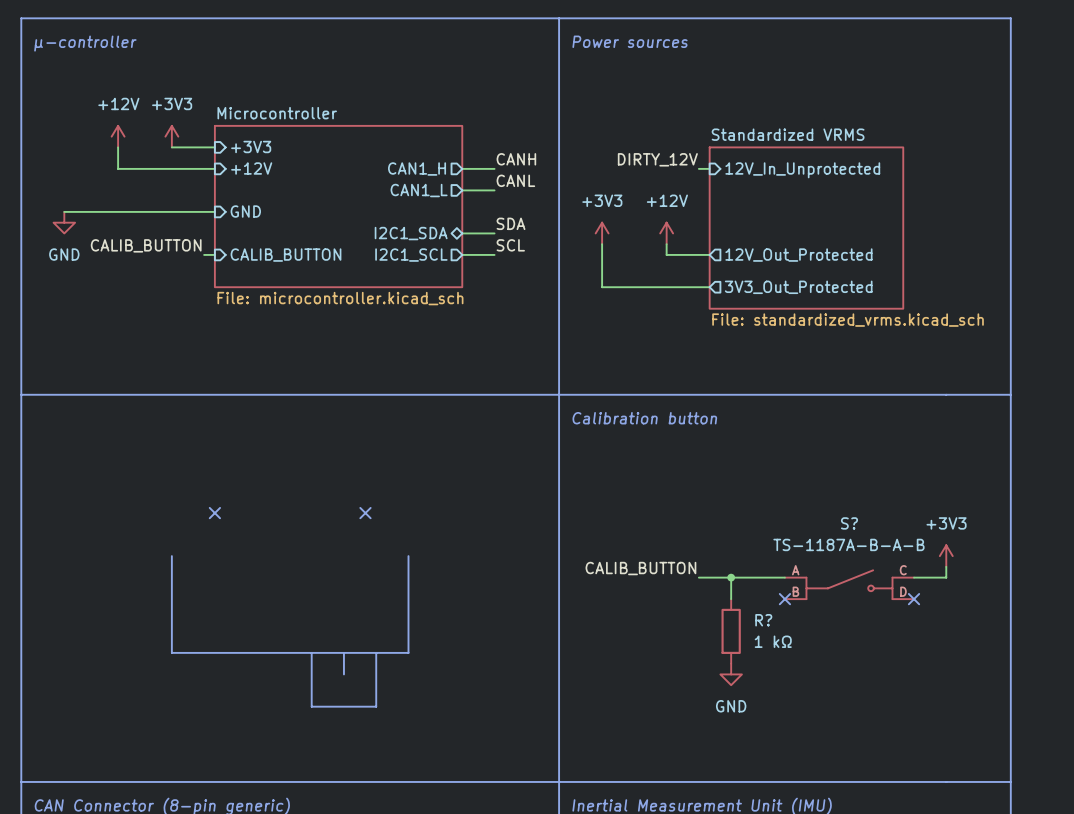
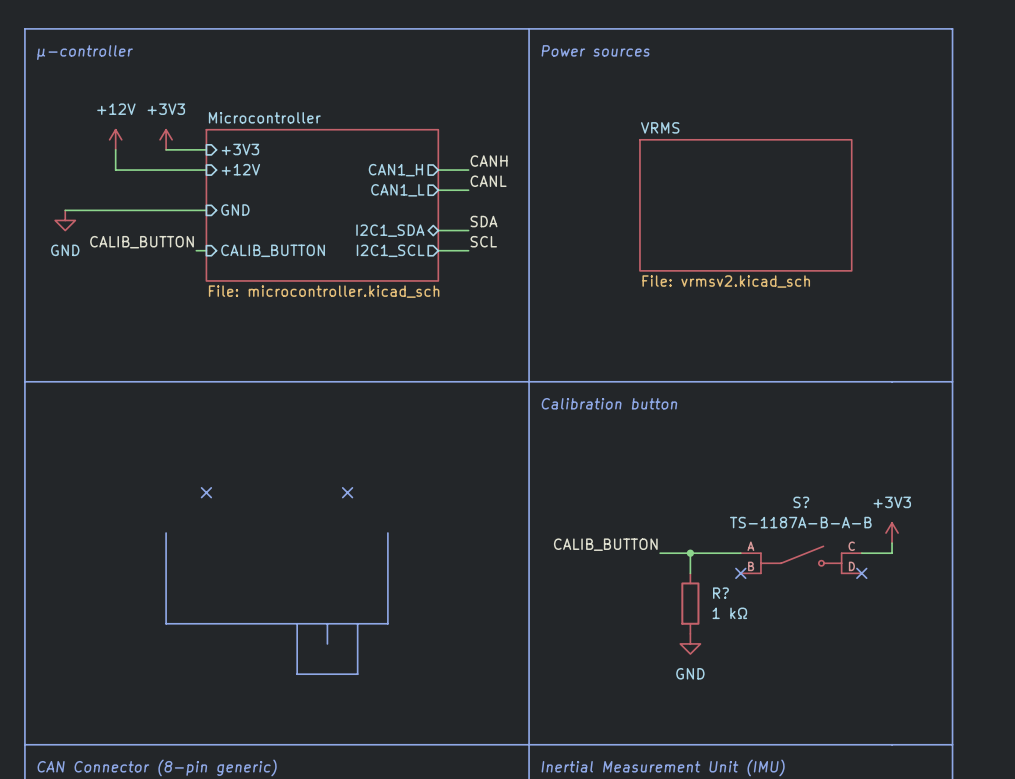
label: DIRTY_12V (657, 159) -> none
wire: (698, 168) (709, 168) -> none
sheet pin: 12V_In_Unprotected (802, 170) -> none
sheet VRMS: none -> File: vrmsv2.kicad_sch (745, 205)
sheet Standardized VRMS: File: standardized_vrms.kicad_sch (806, 228) -> none
power symbol: +3V3 (602, 233) -> none
power symbol: +12V (666, 233) -> none
wire: (602, 244) (602, 287) (709, 287) -> none
wire: (666, 244) (666, 254) (709, 254) -> none
sheet pin: 12V_Out_Protected (798, 255) -> none
sheet pin: 3V3_Out_Protected (798, 287) -> none

